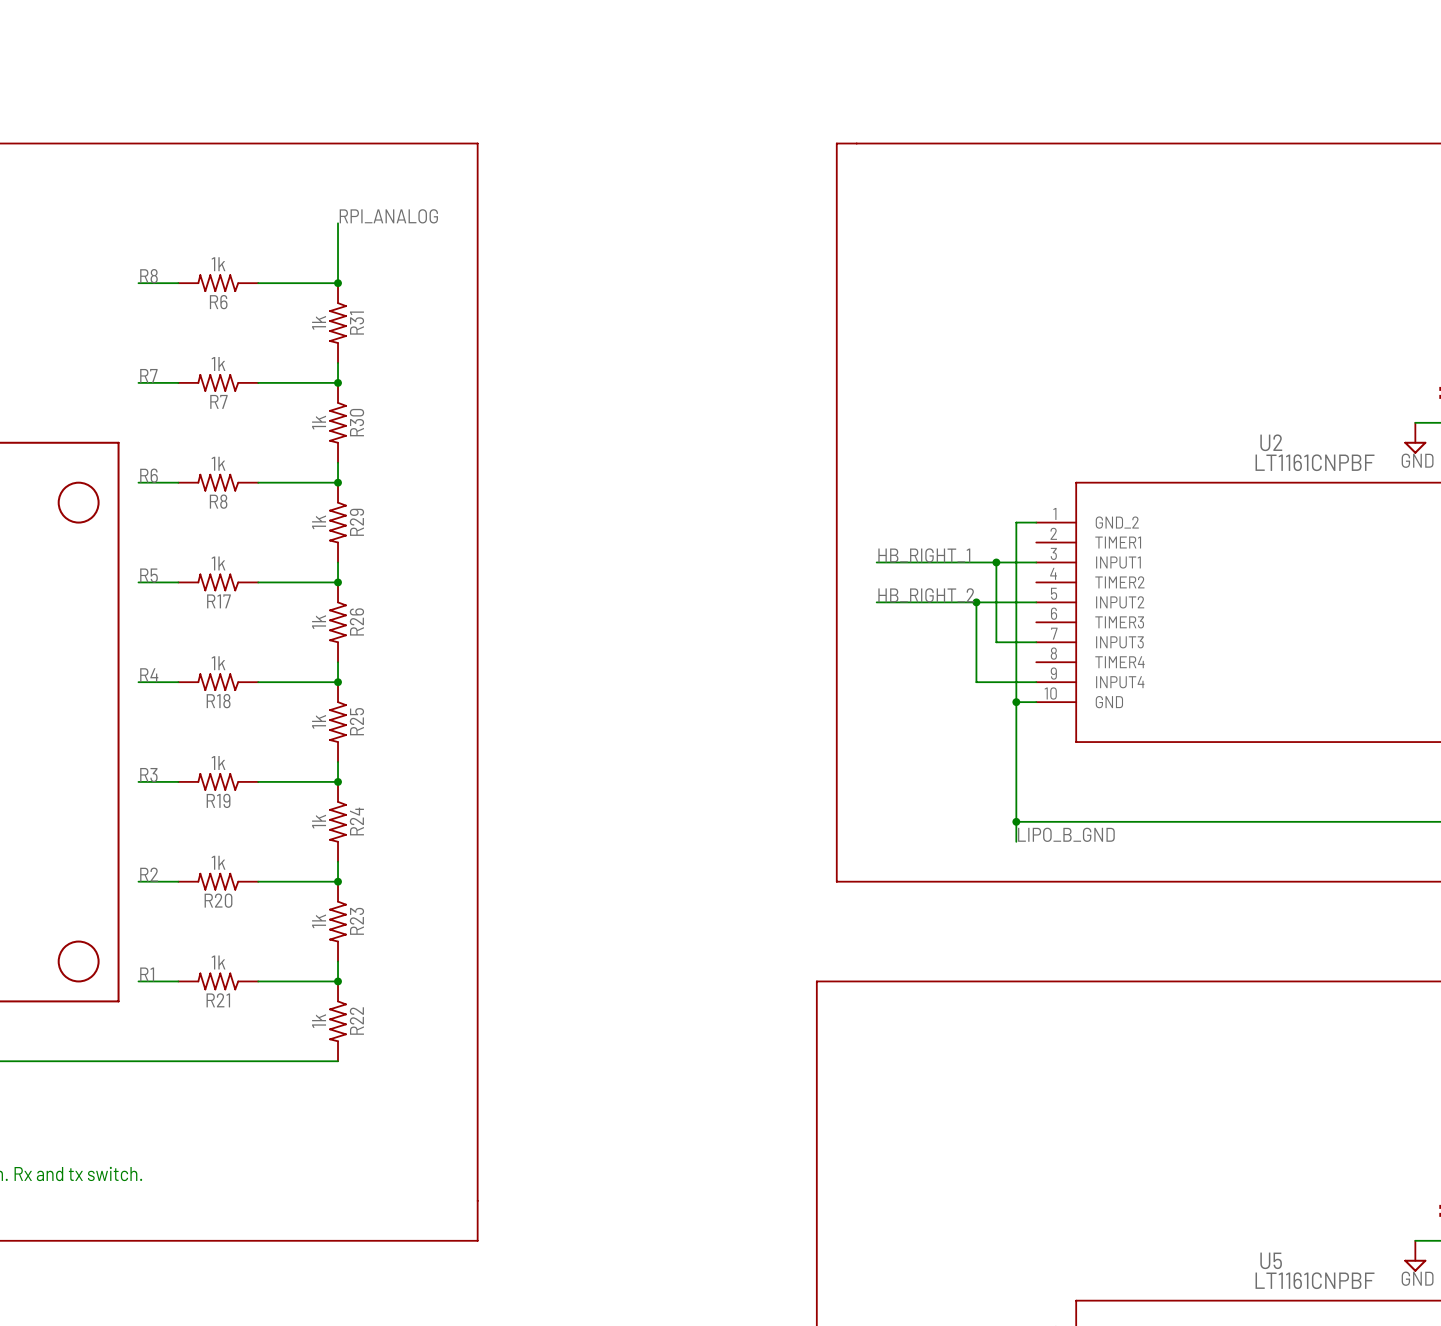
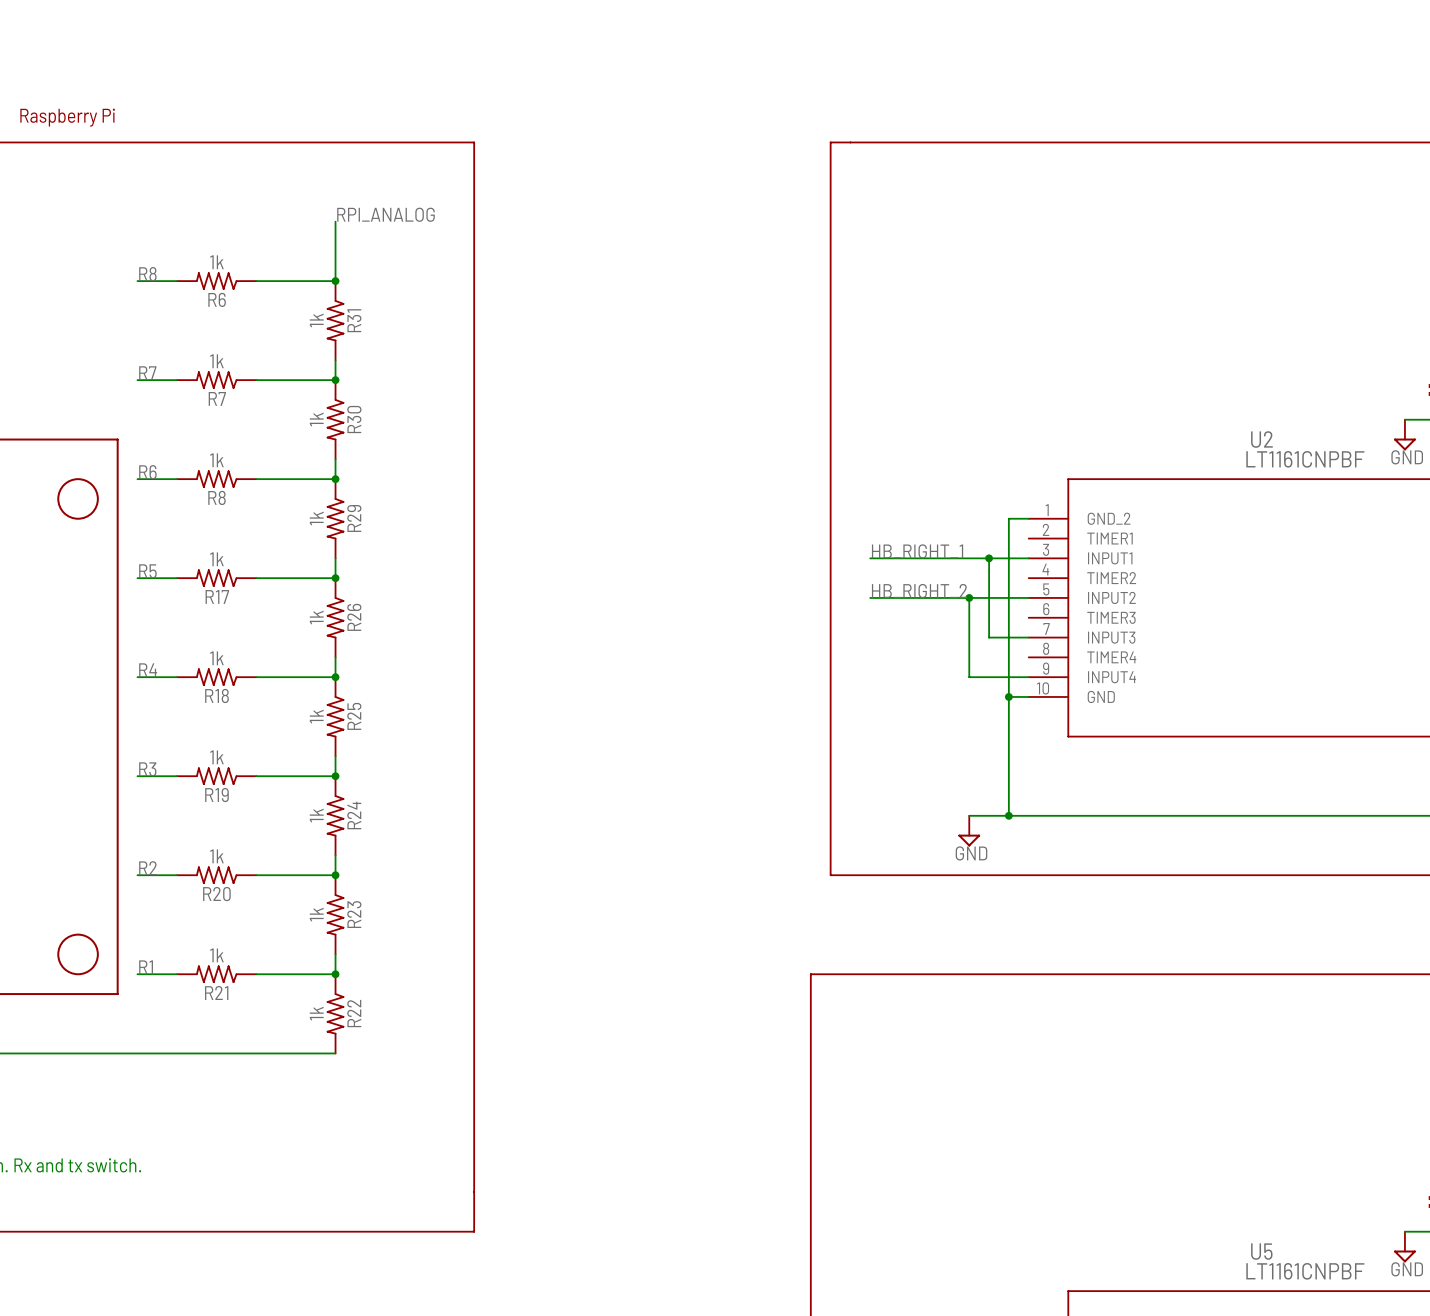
text: none -> Raspberry Pi (67, 117)
wire: (1016, 821) (1016, 841) -> (1008, 815) (969, 815)
label: LIPO_B_GND (1066, 834) -> none
power symbol: none -> GND (969, 831)

